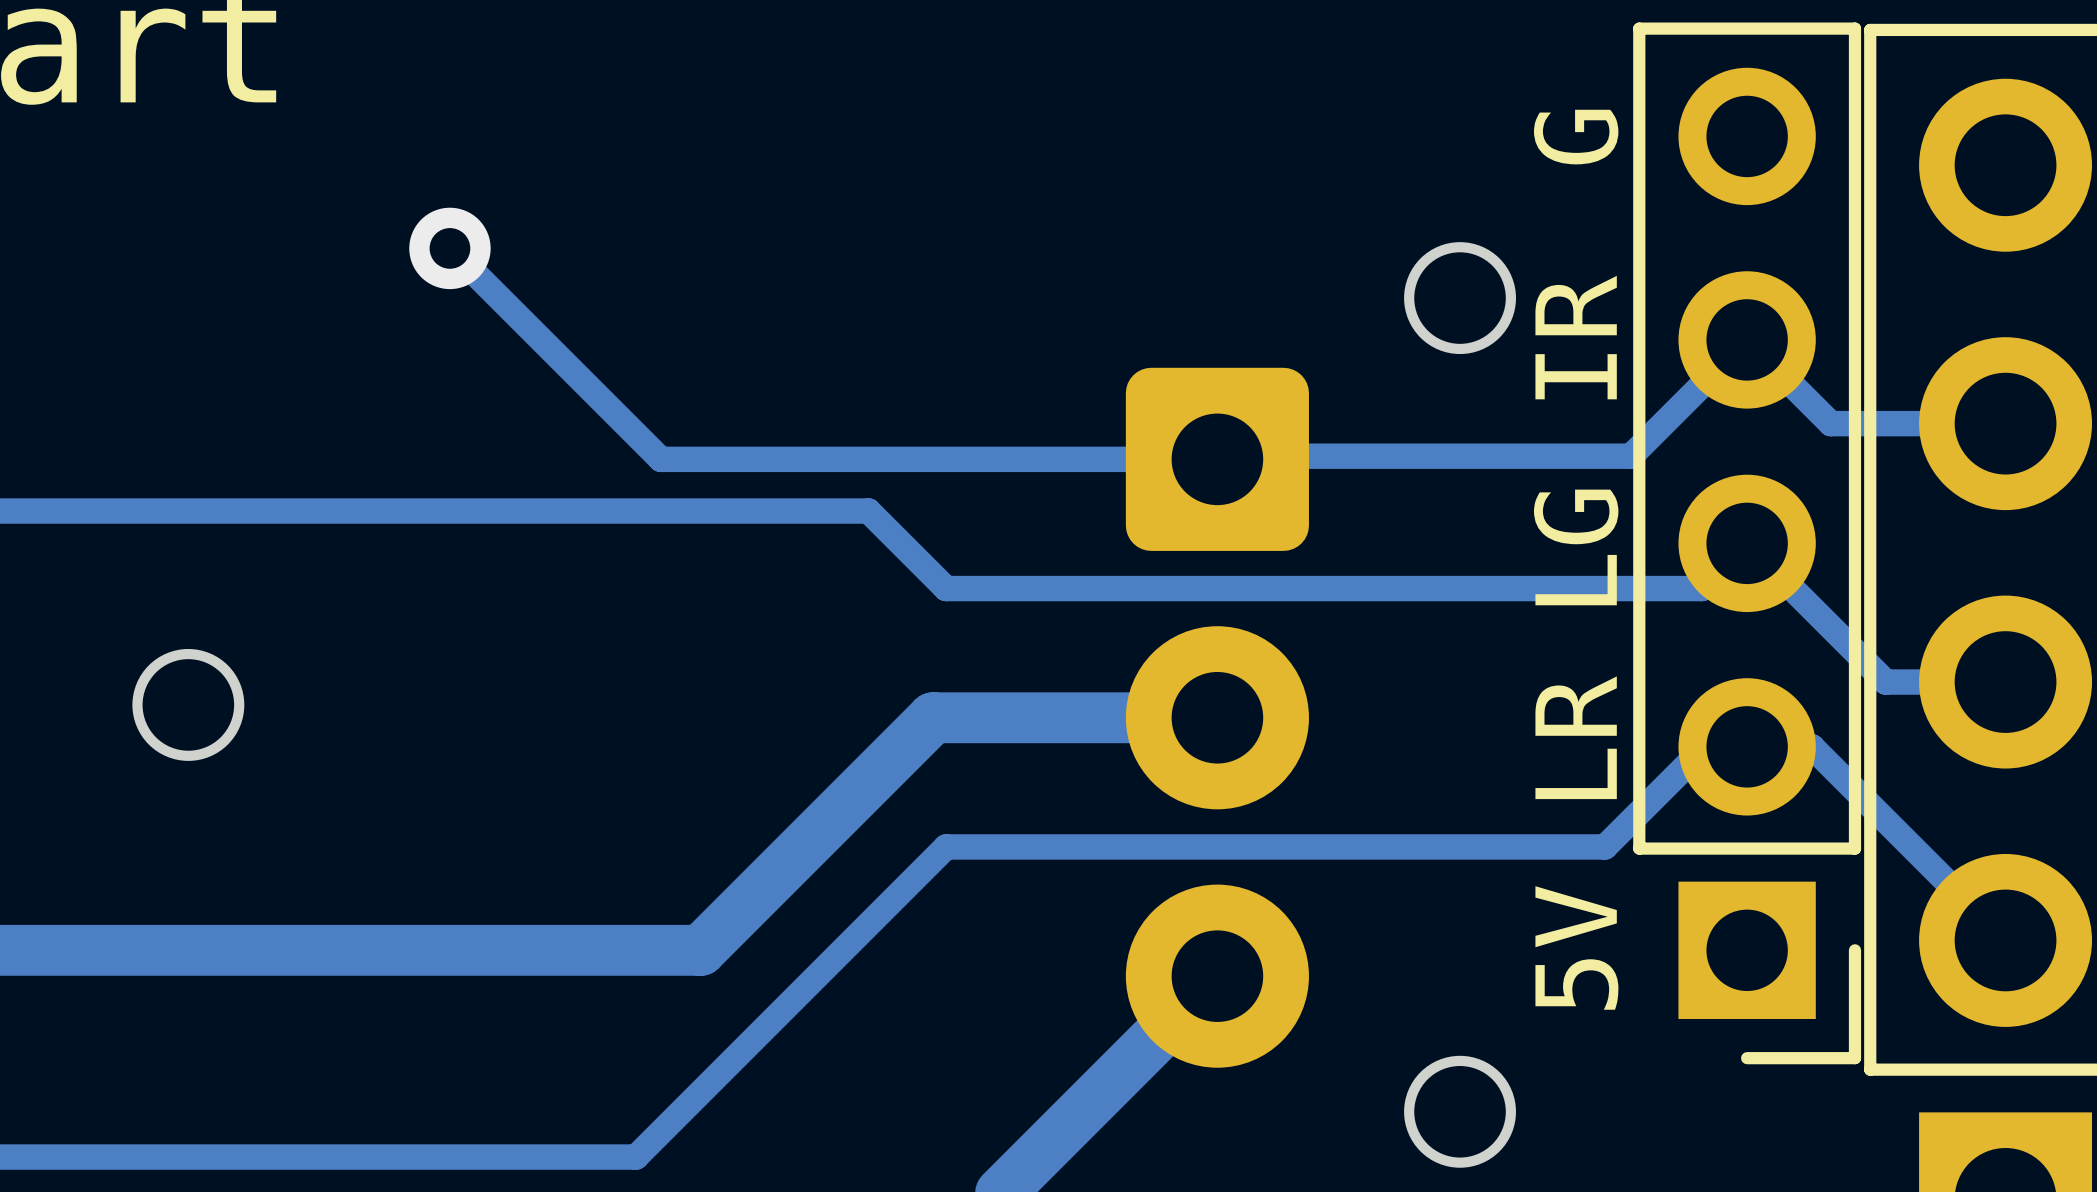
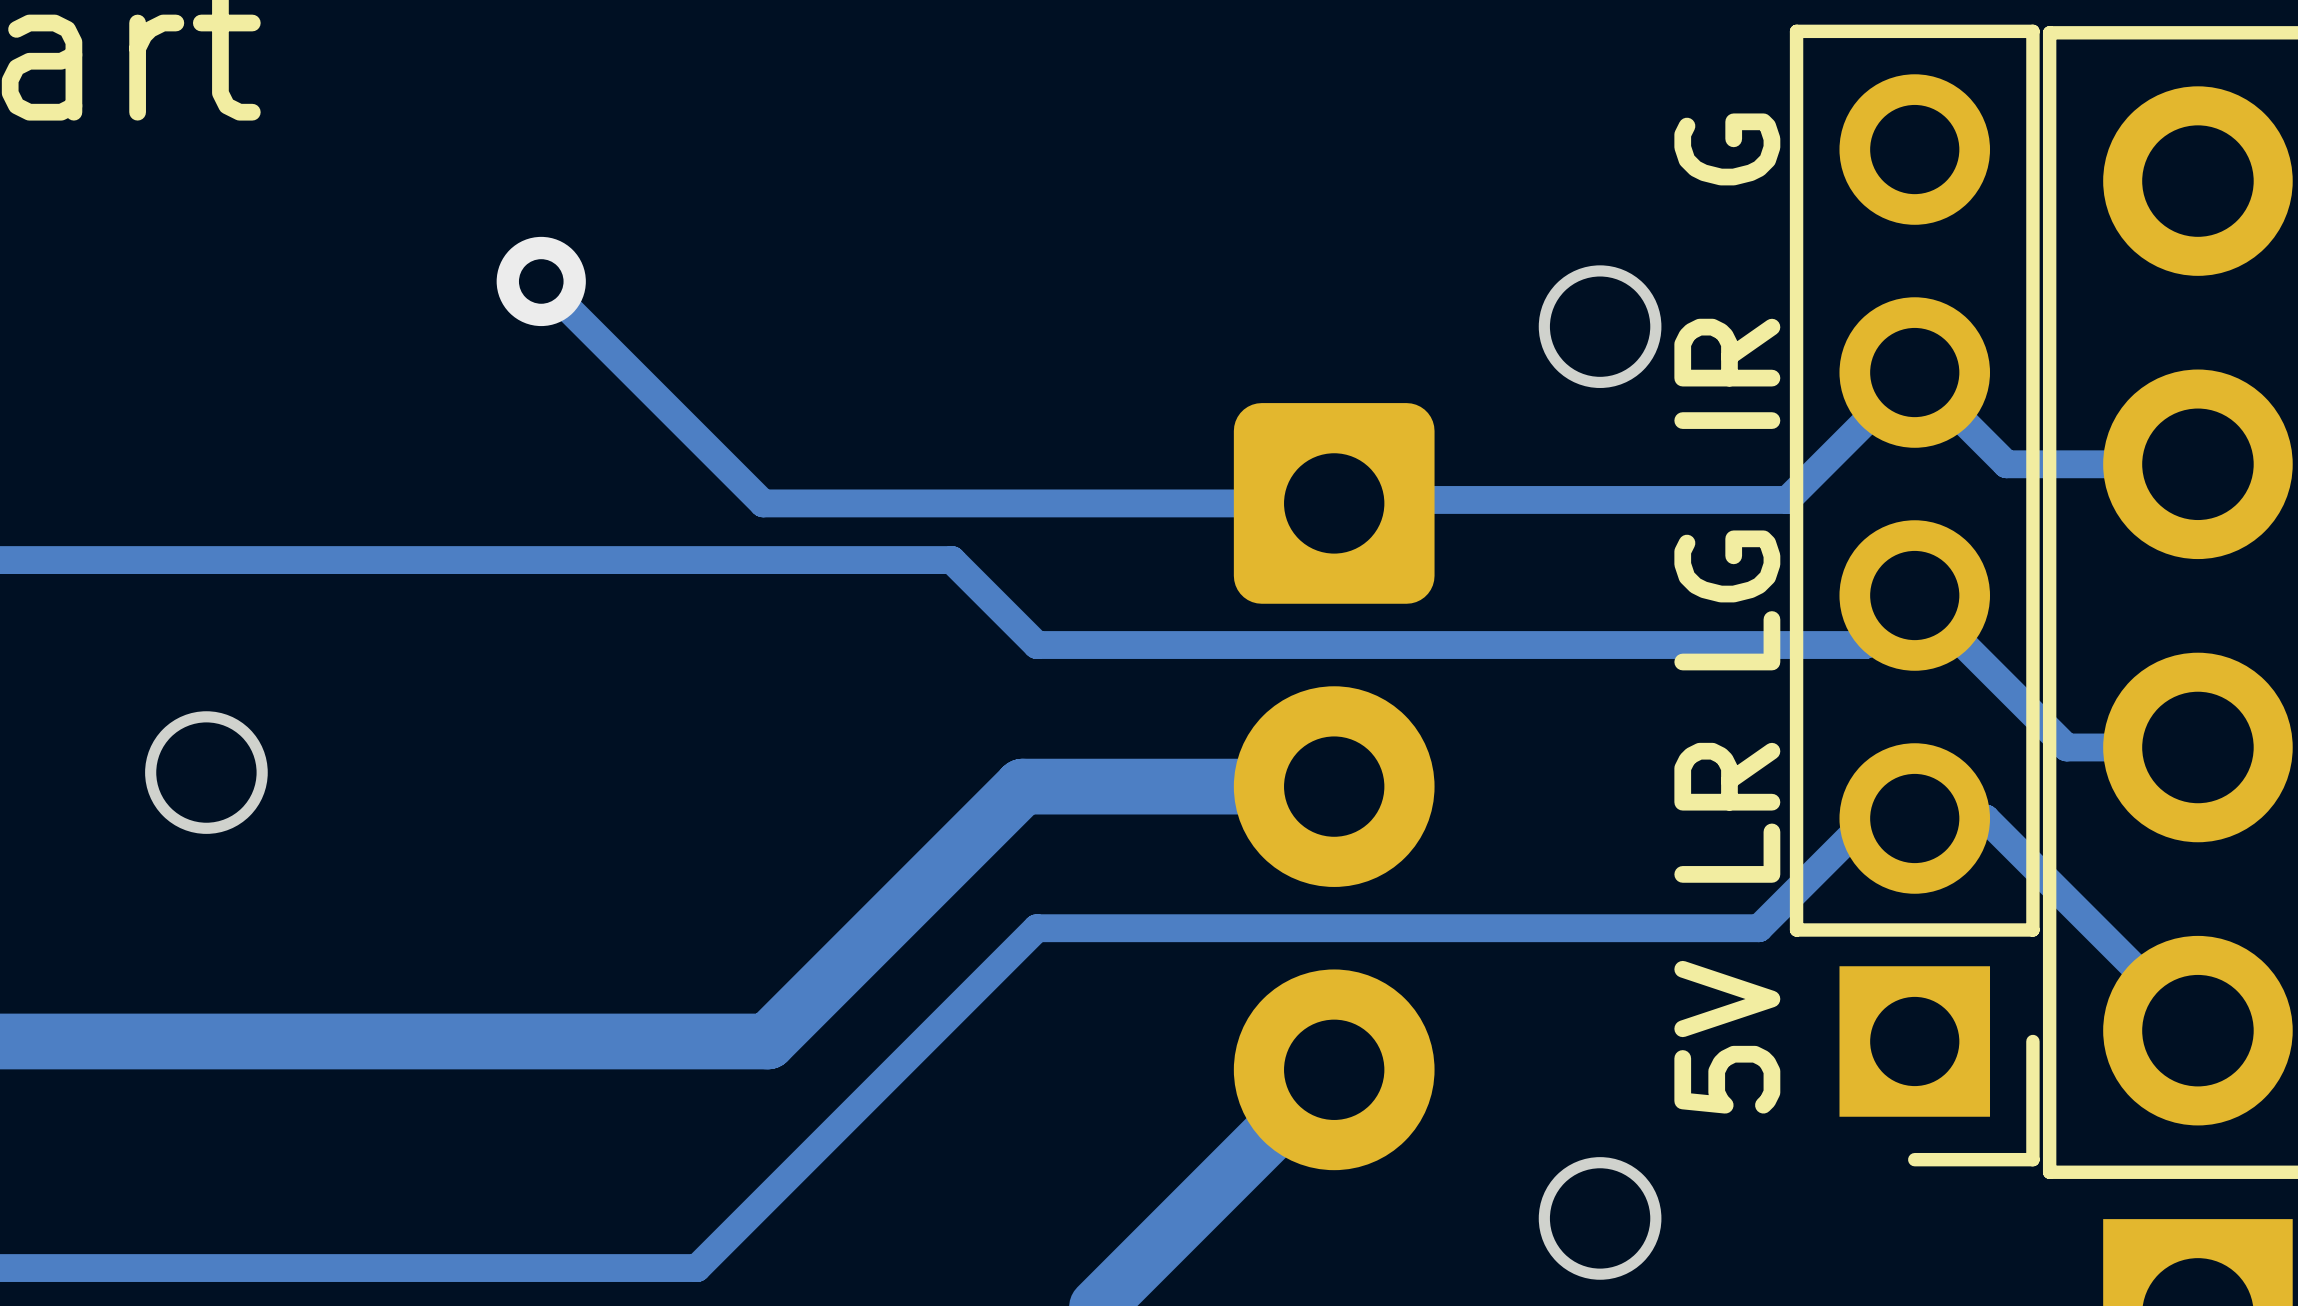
track: (449, 248) (660, 459) (696, 459) -> (541, 281) (763, 503)
via position: (449, 248) -> (541, 281)

